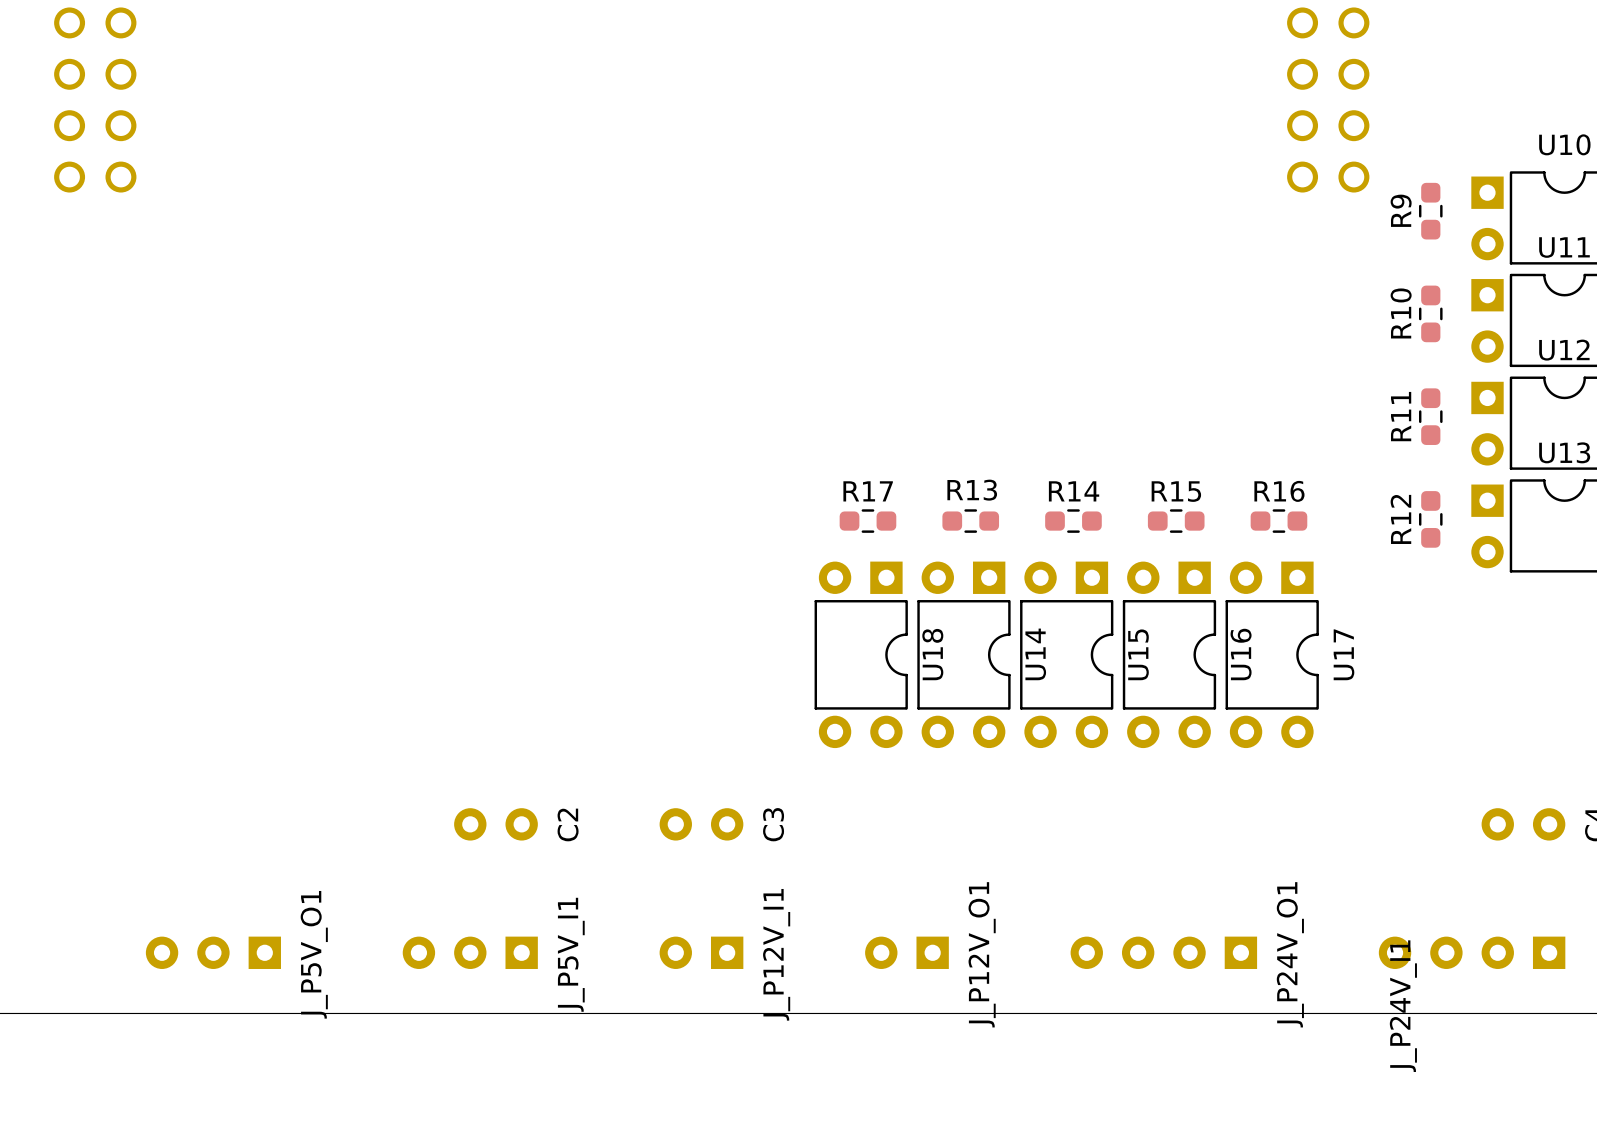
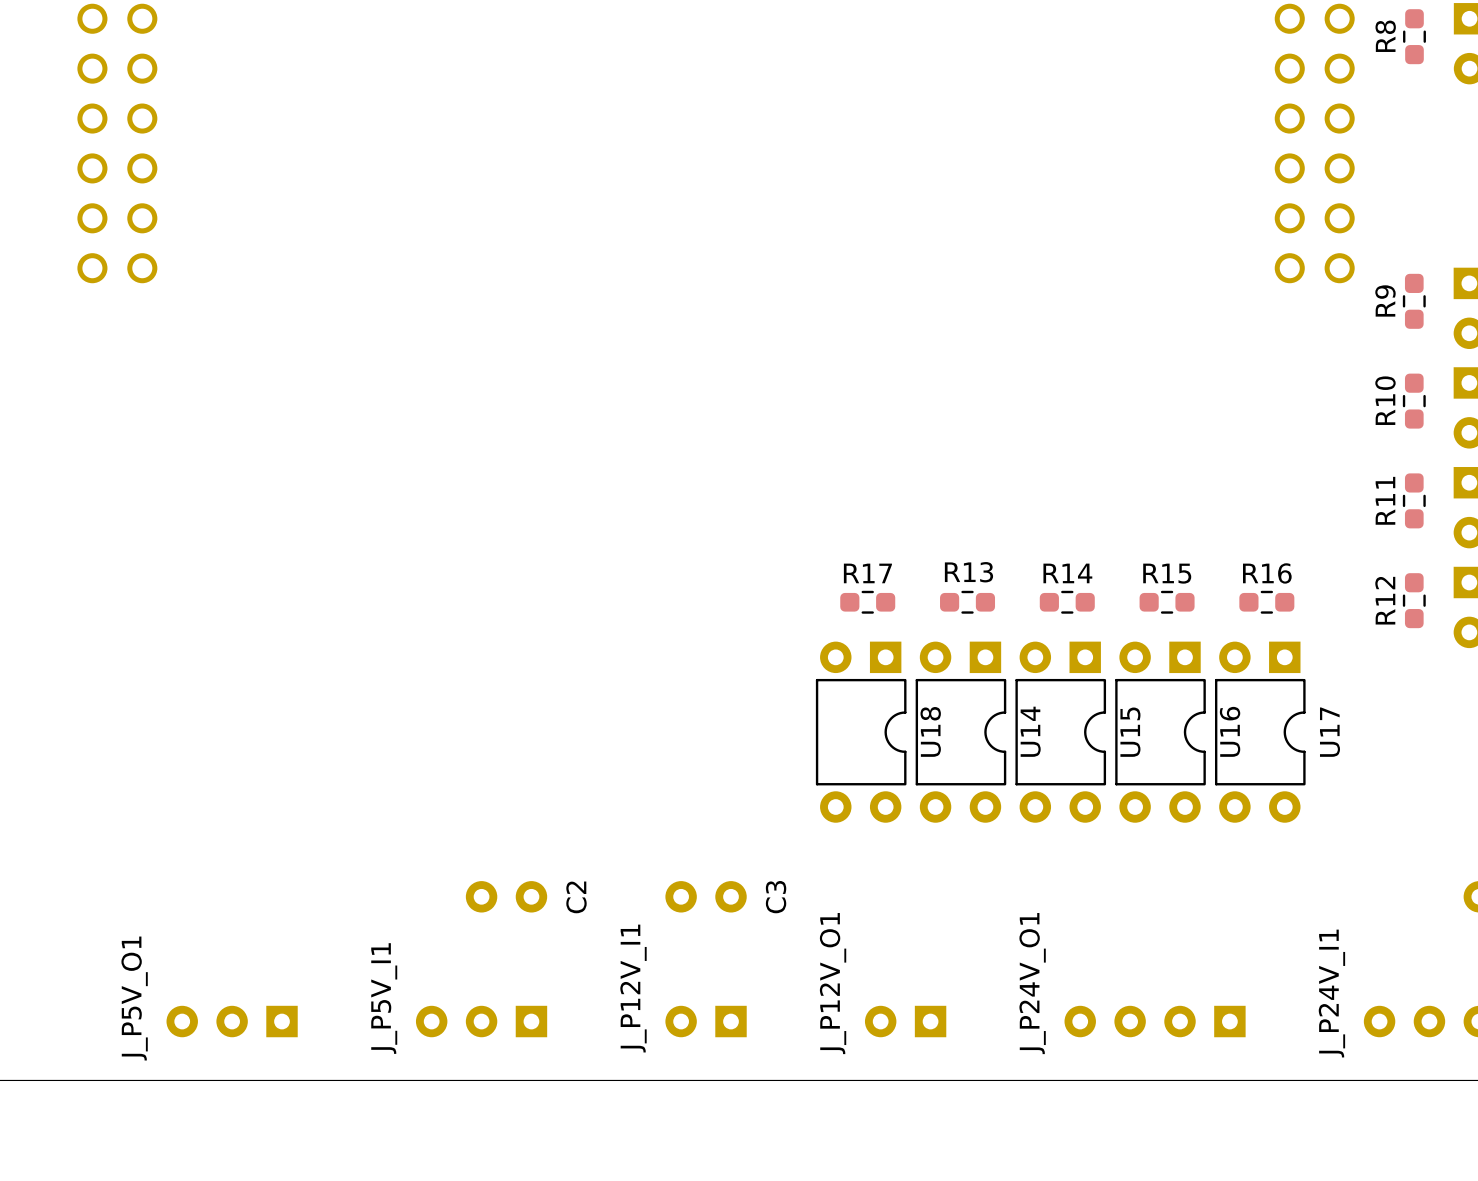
J_P5V_O1 name position: J_P5V_O1 (314, 954) -> J_P5V_O1 (134, 998)
J_P5V_I1 name position: J_P5V_I1 (571, 954) -> J_P5V_I1 (384, 998)
J_P12V_I1 name position: J_P12V_I1 (776, 954) -> J_P12V_I1 (633, 988)
J_P12V_O1 name position: J_P12V_O1 (982, 954) -> J_P12V_O1 (833, 983)
J_P24V_O1 name position: J_P24V_O1 (1290, 954) -> J_P24V_O1 (1032, 983)
J_P24V_I1 name position: J_P24V_I1 (1403, 1006) -> J_P24V_I1 (1331, 993)

